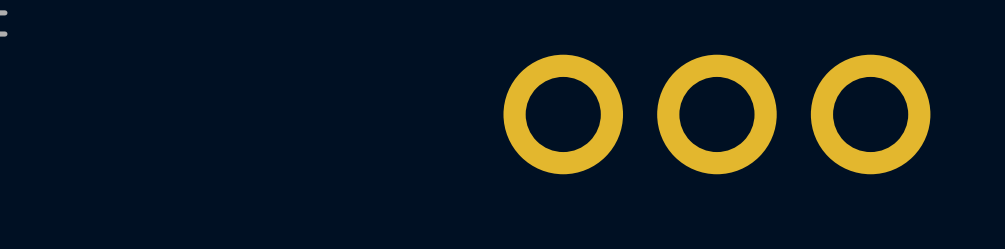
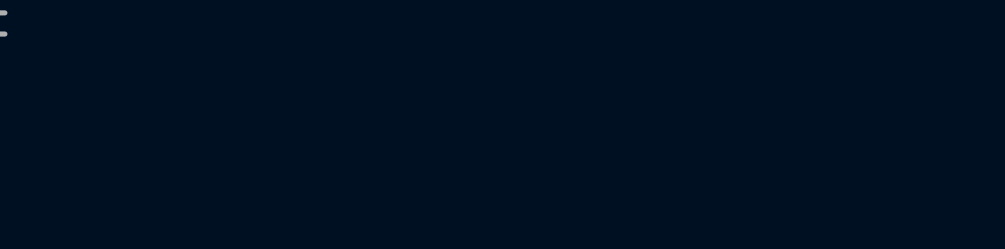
part: (563, 114) -> none
part: (716, 114) -> none
part: (870, 114) -> none

